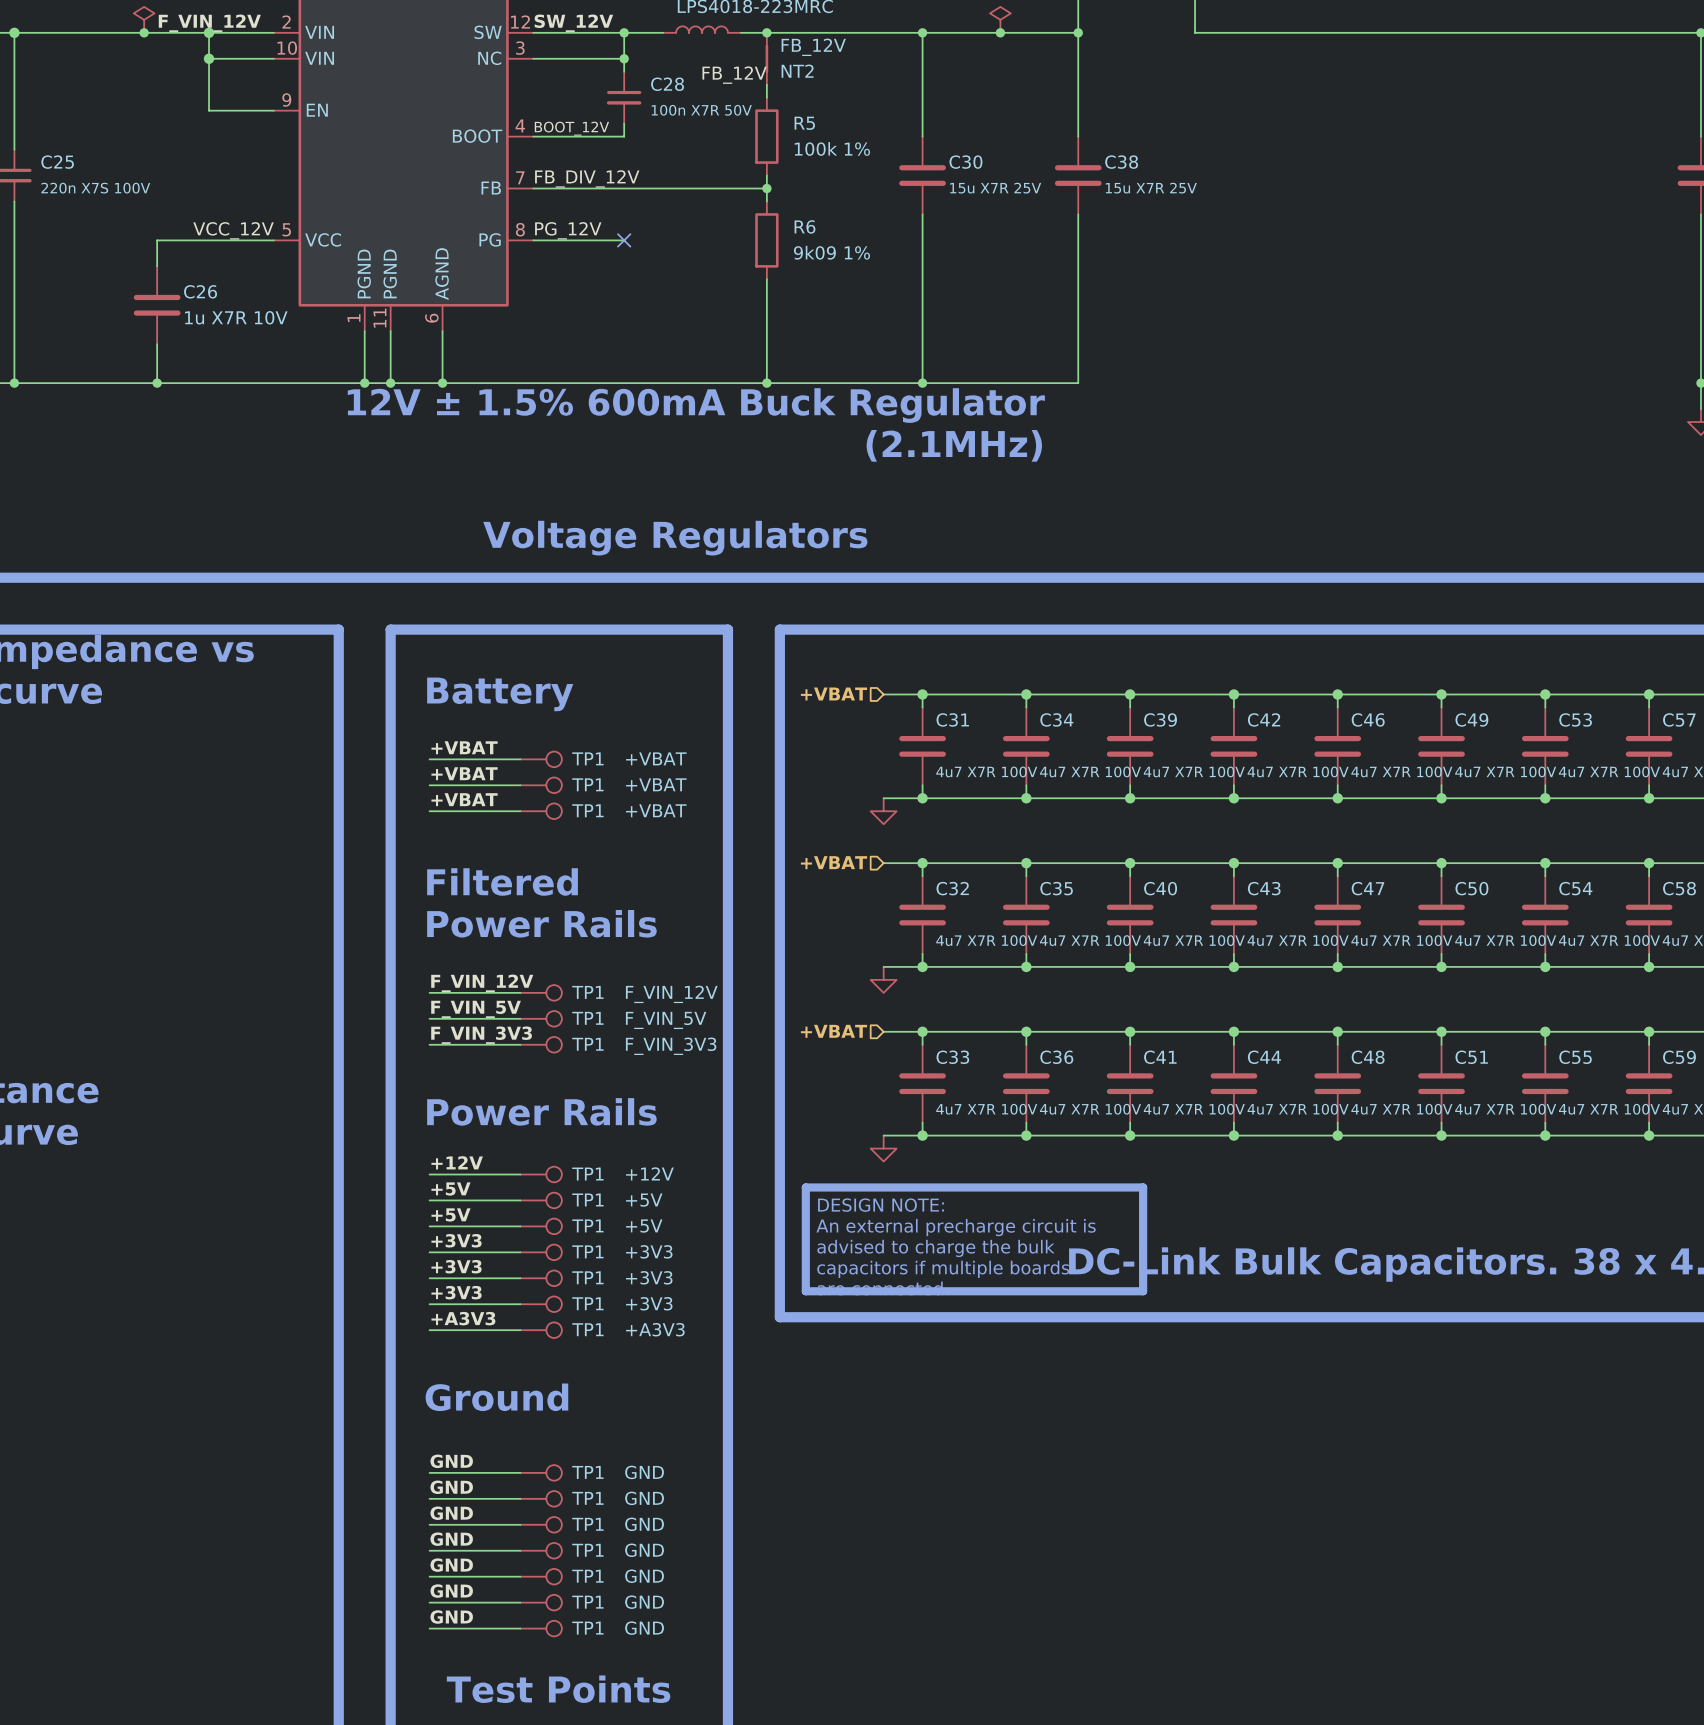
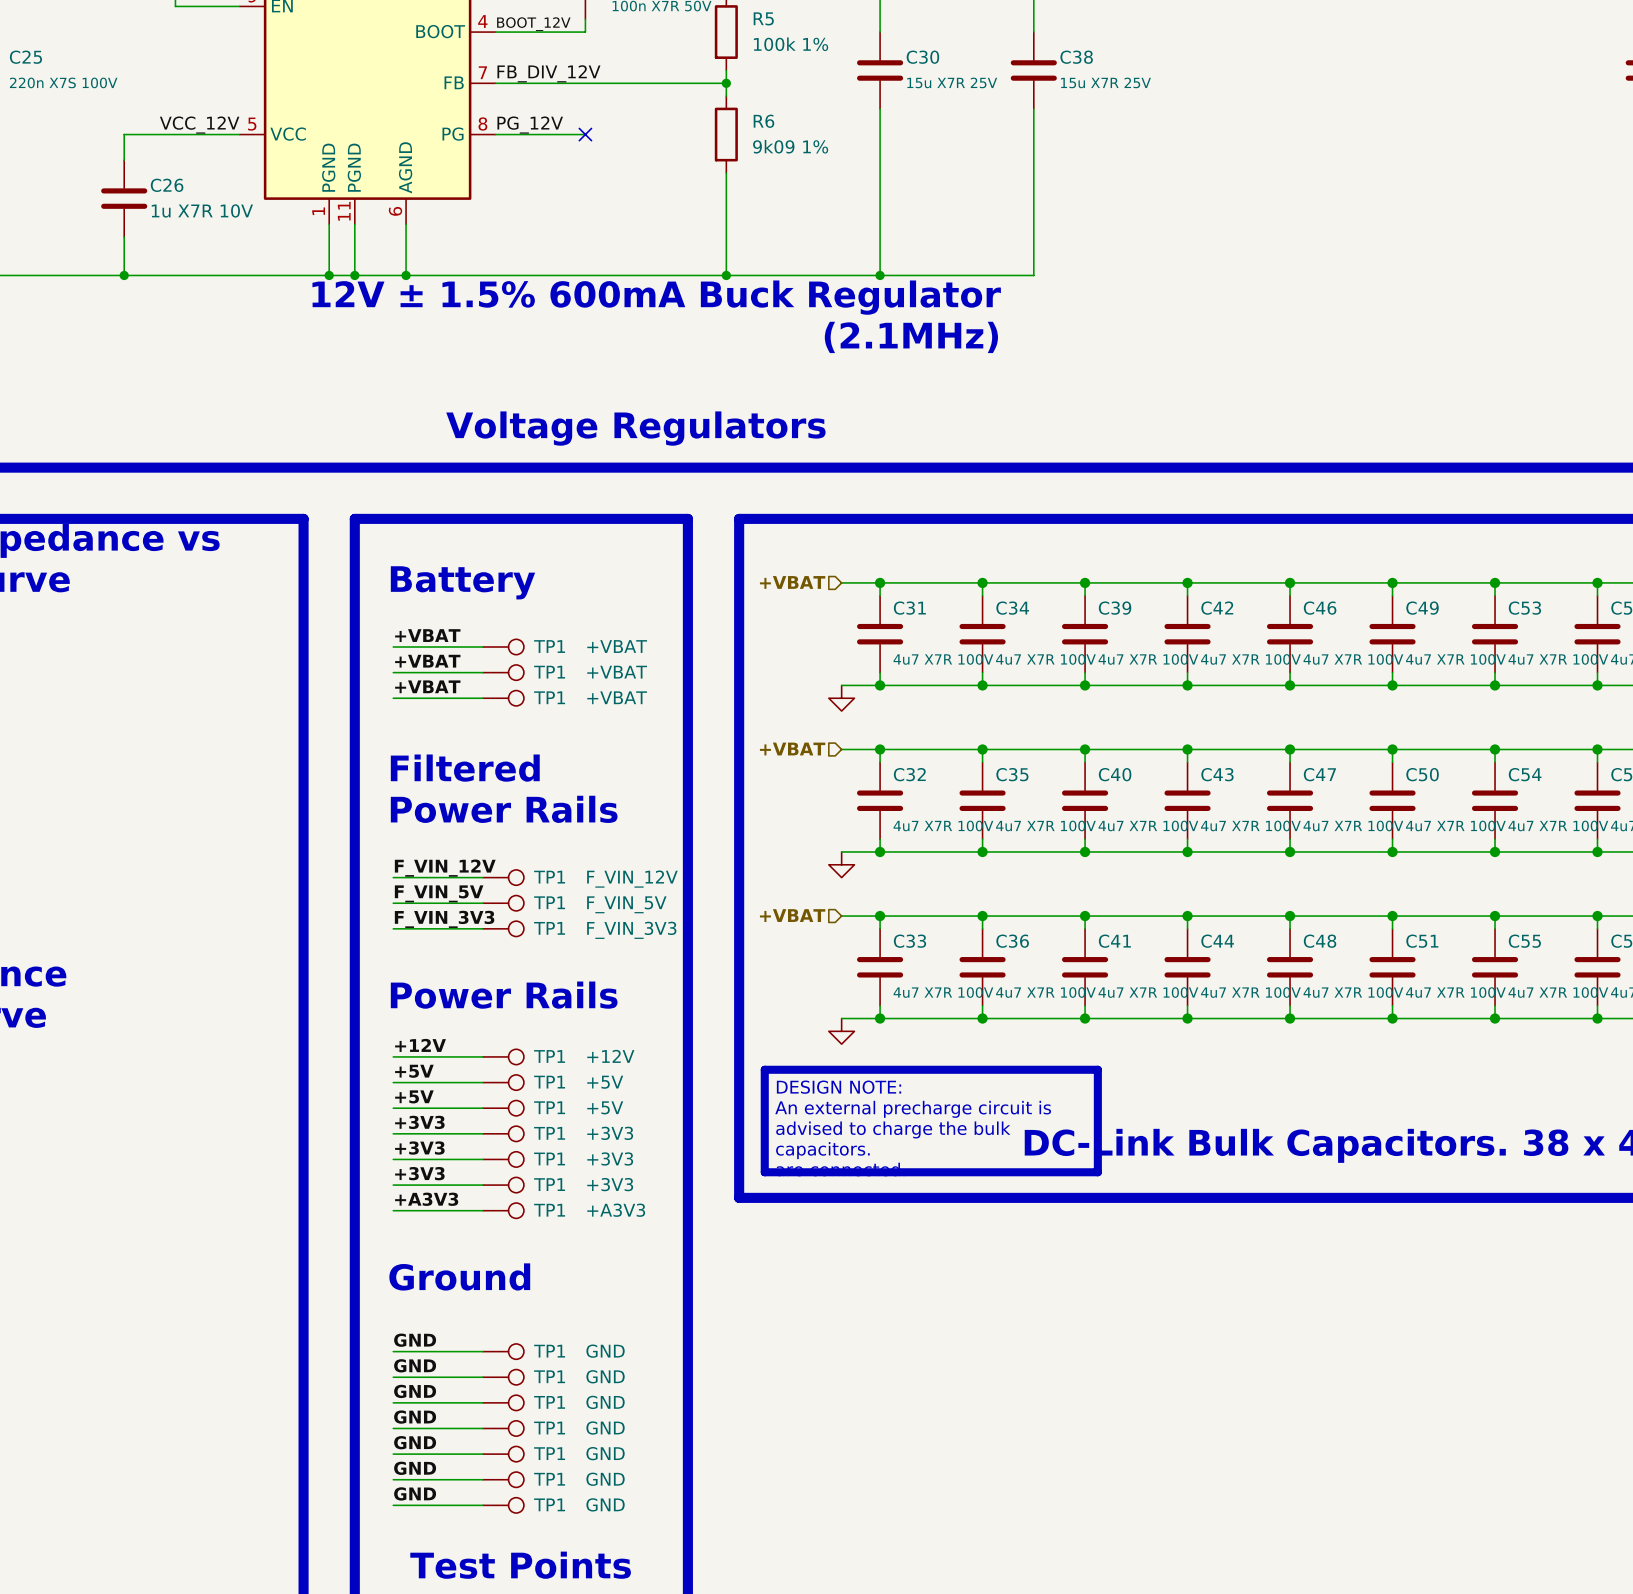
text: capacitors if multiple boards (943, 1269) -> capacitors. (822, 1150)

